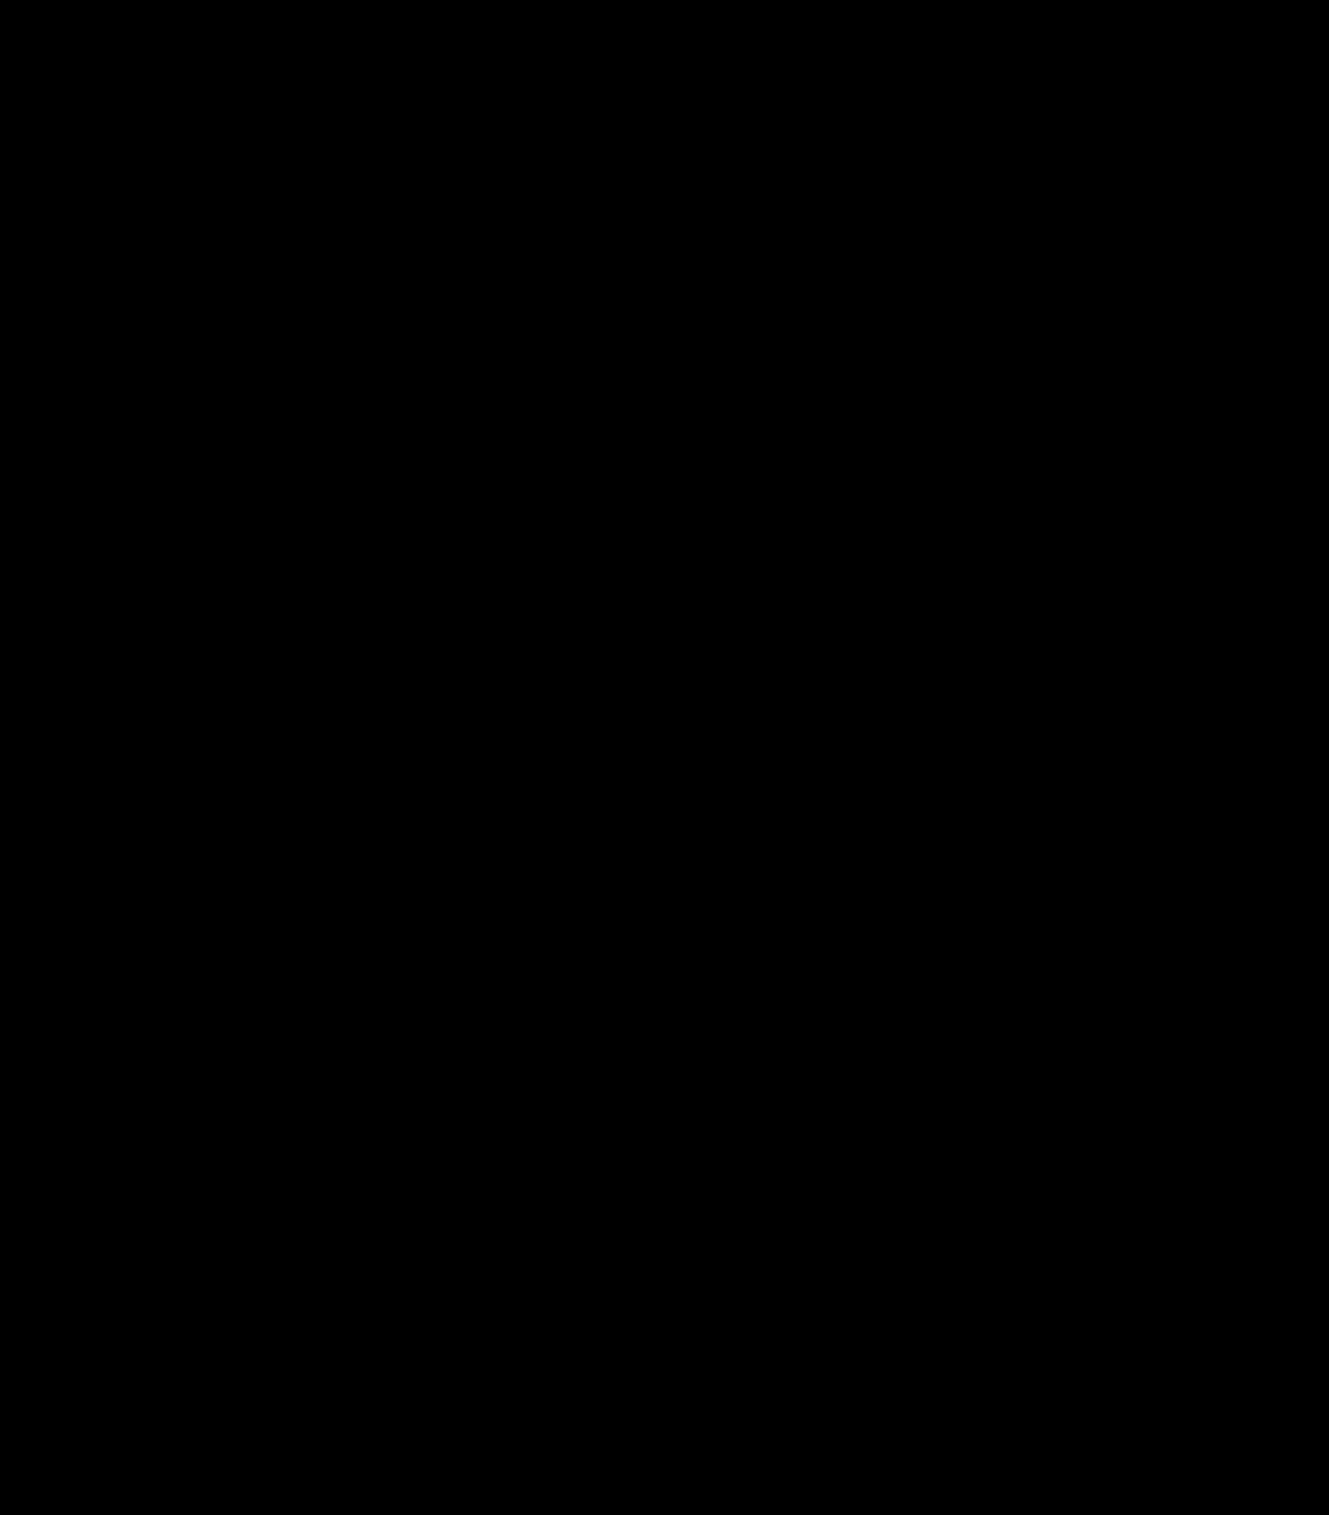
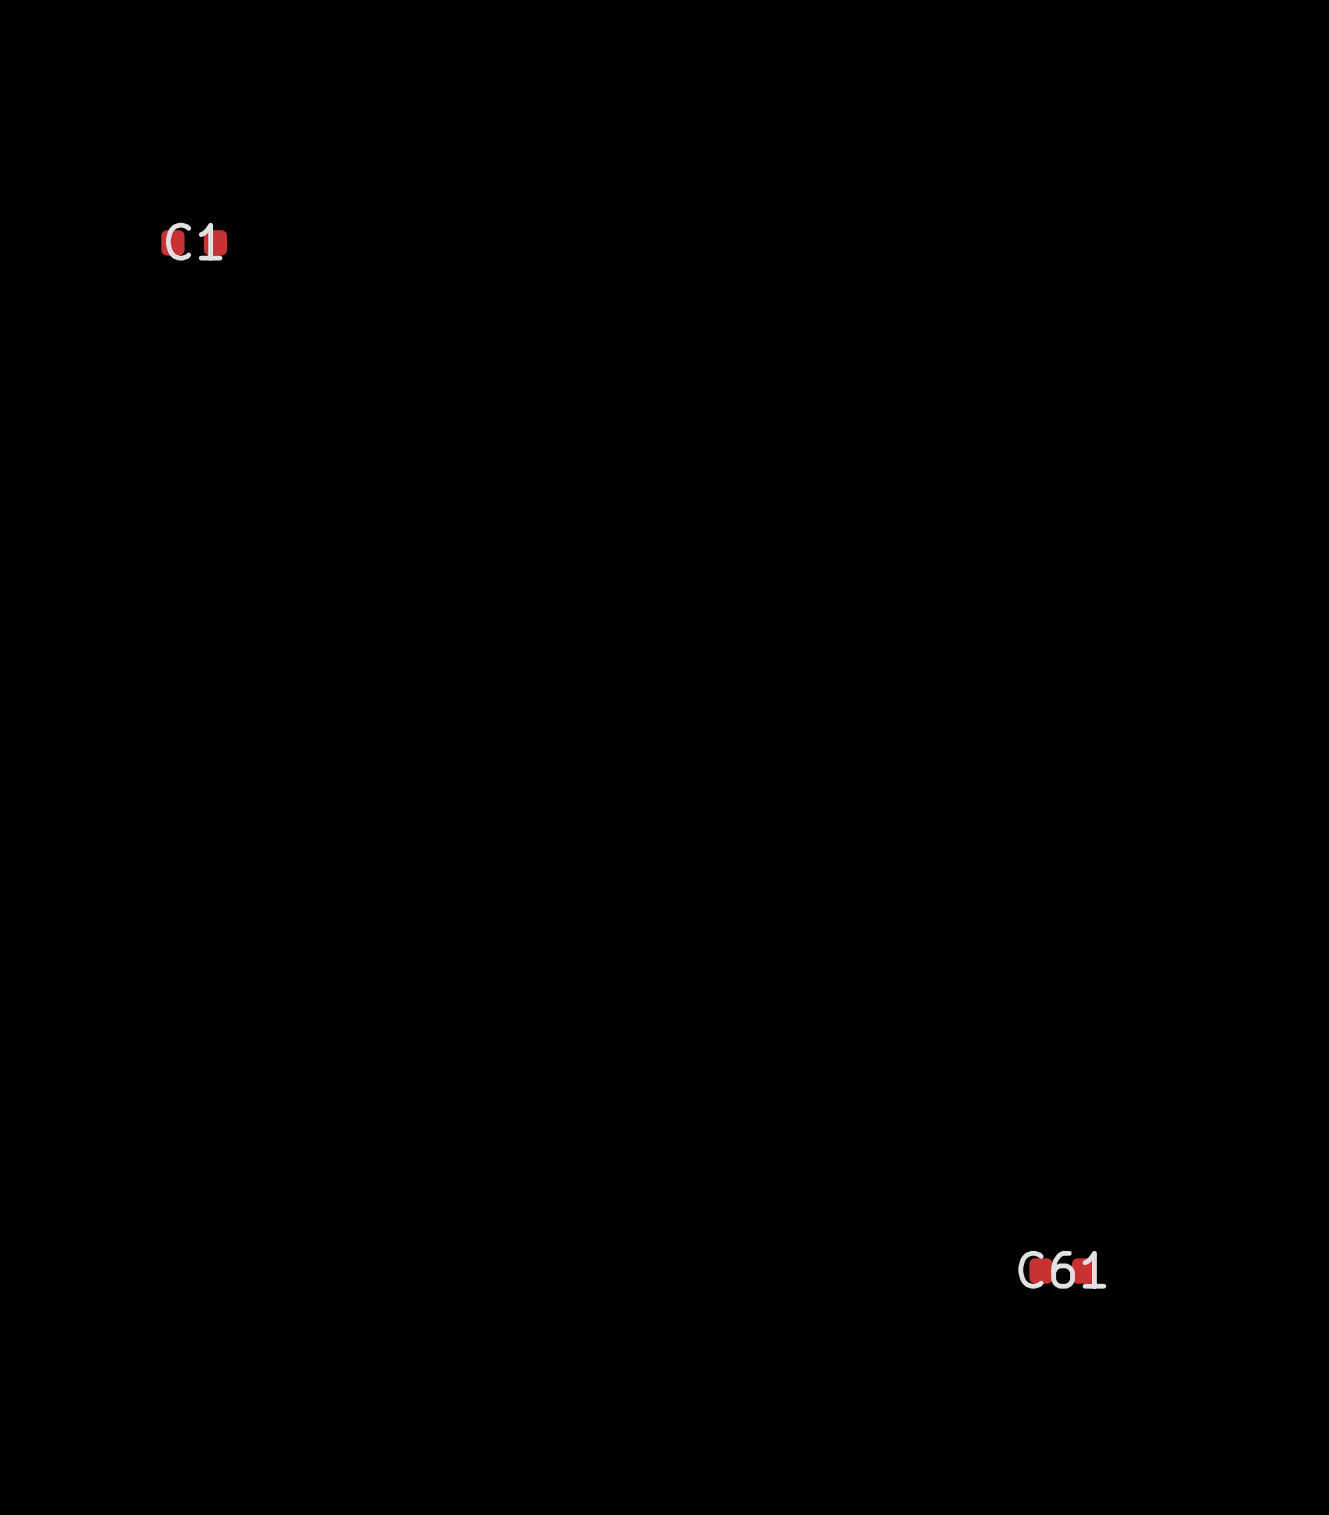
C1: none -> (194, 242)
C61: none -> (1062, 1271)

